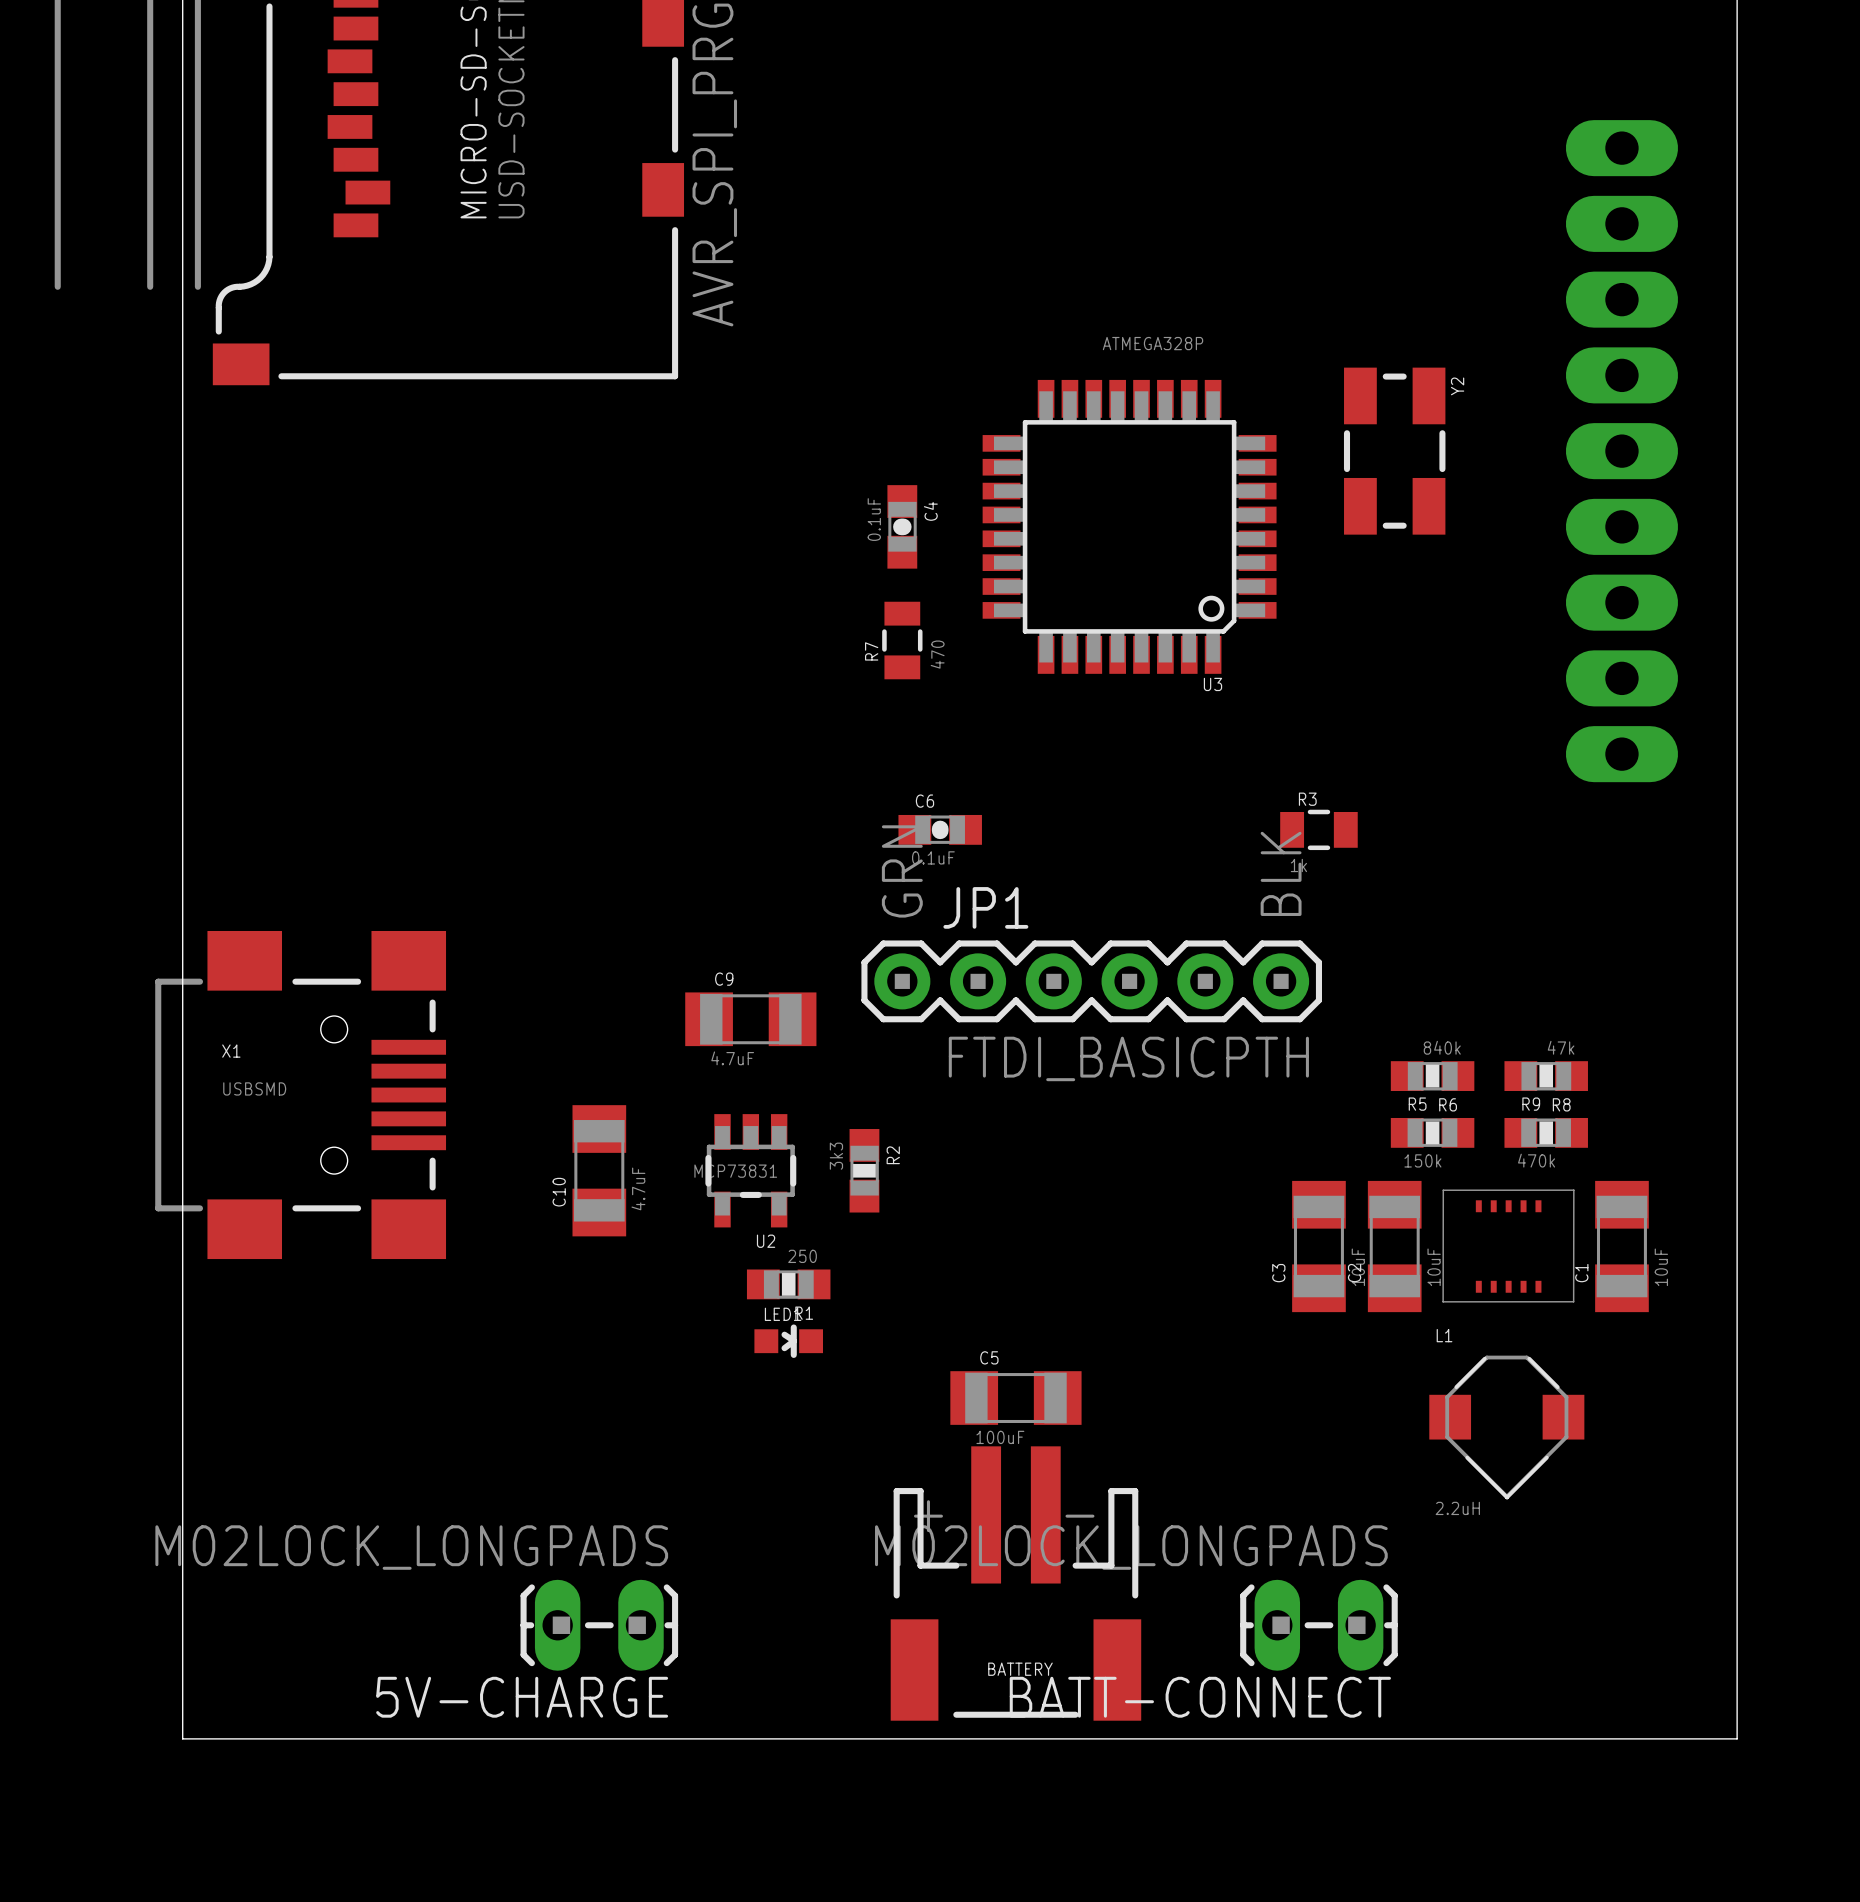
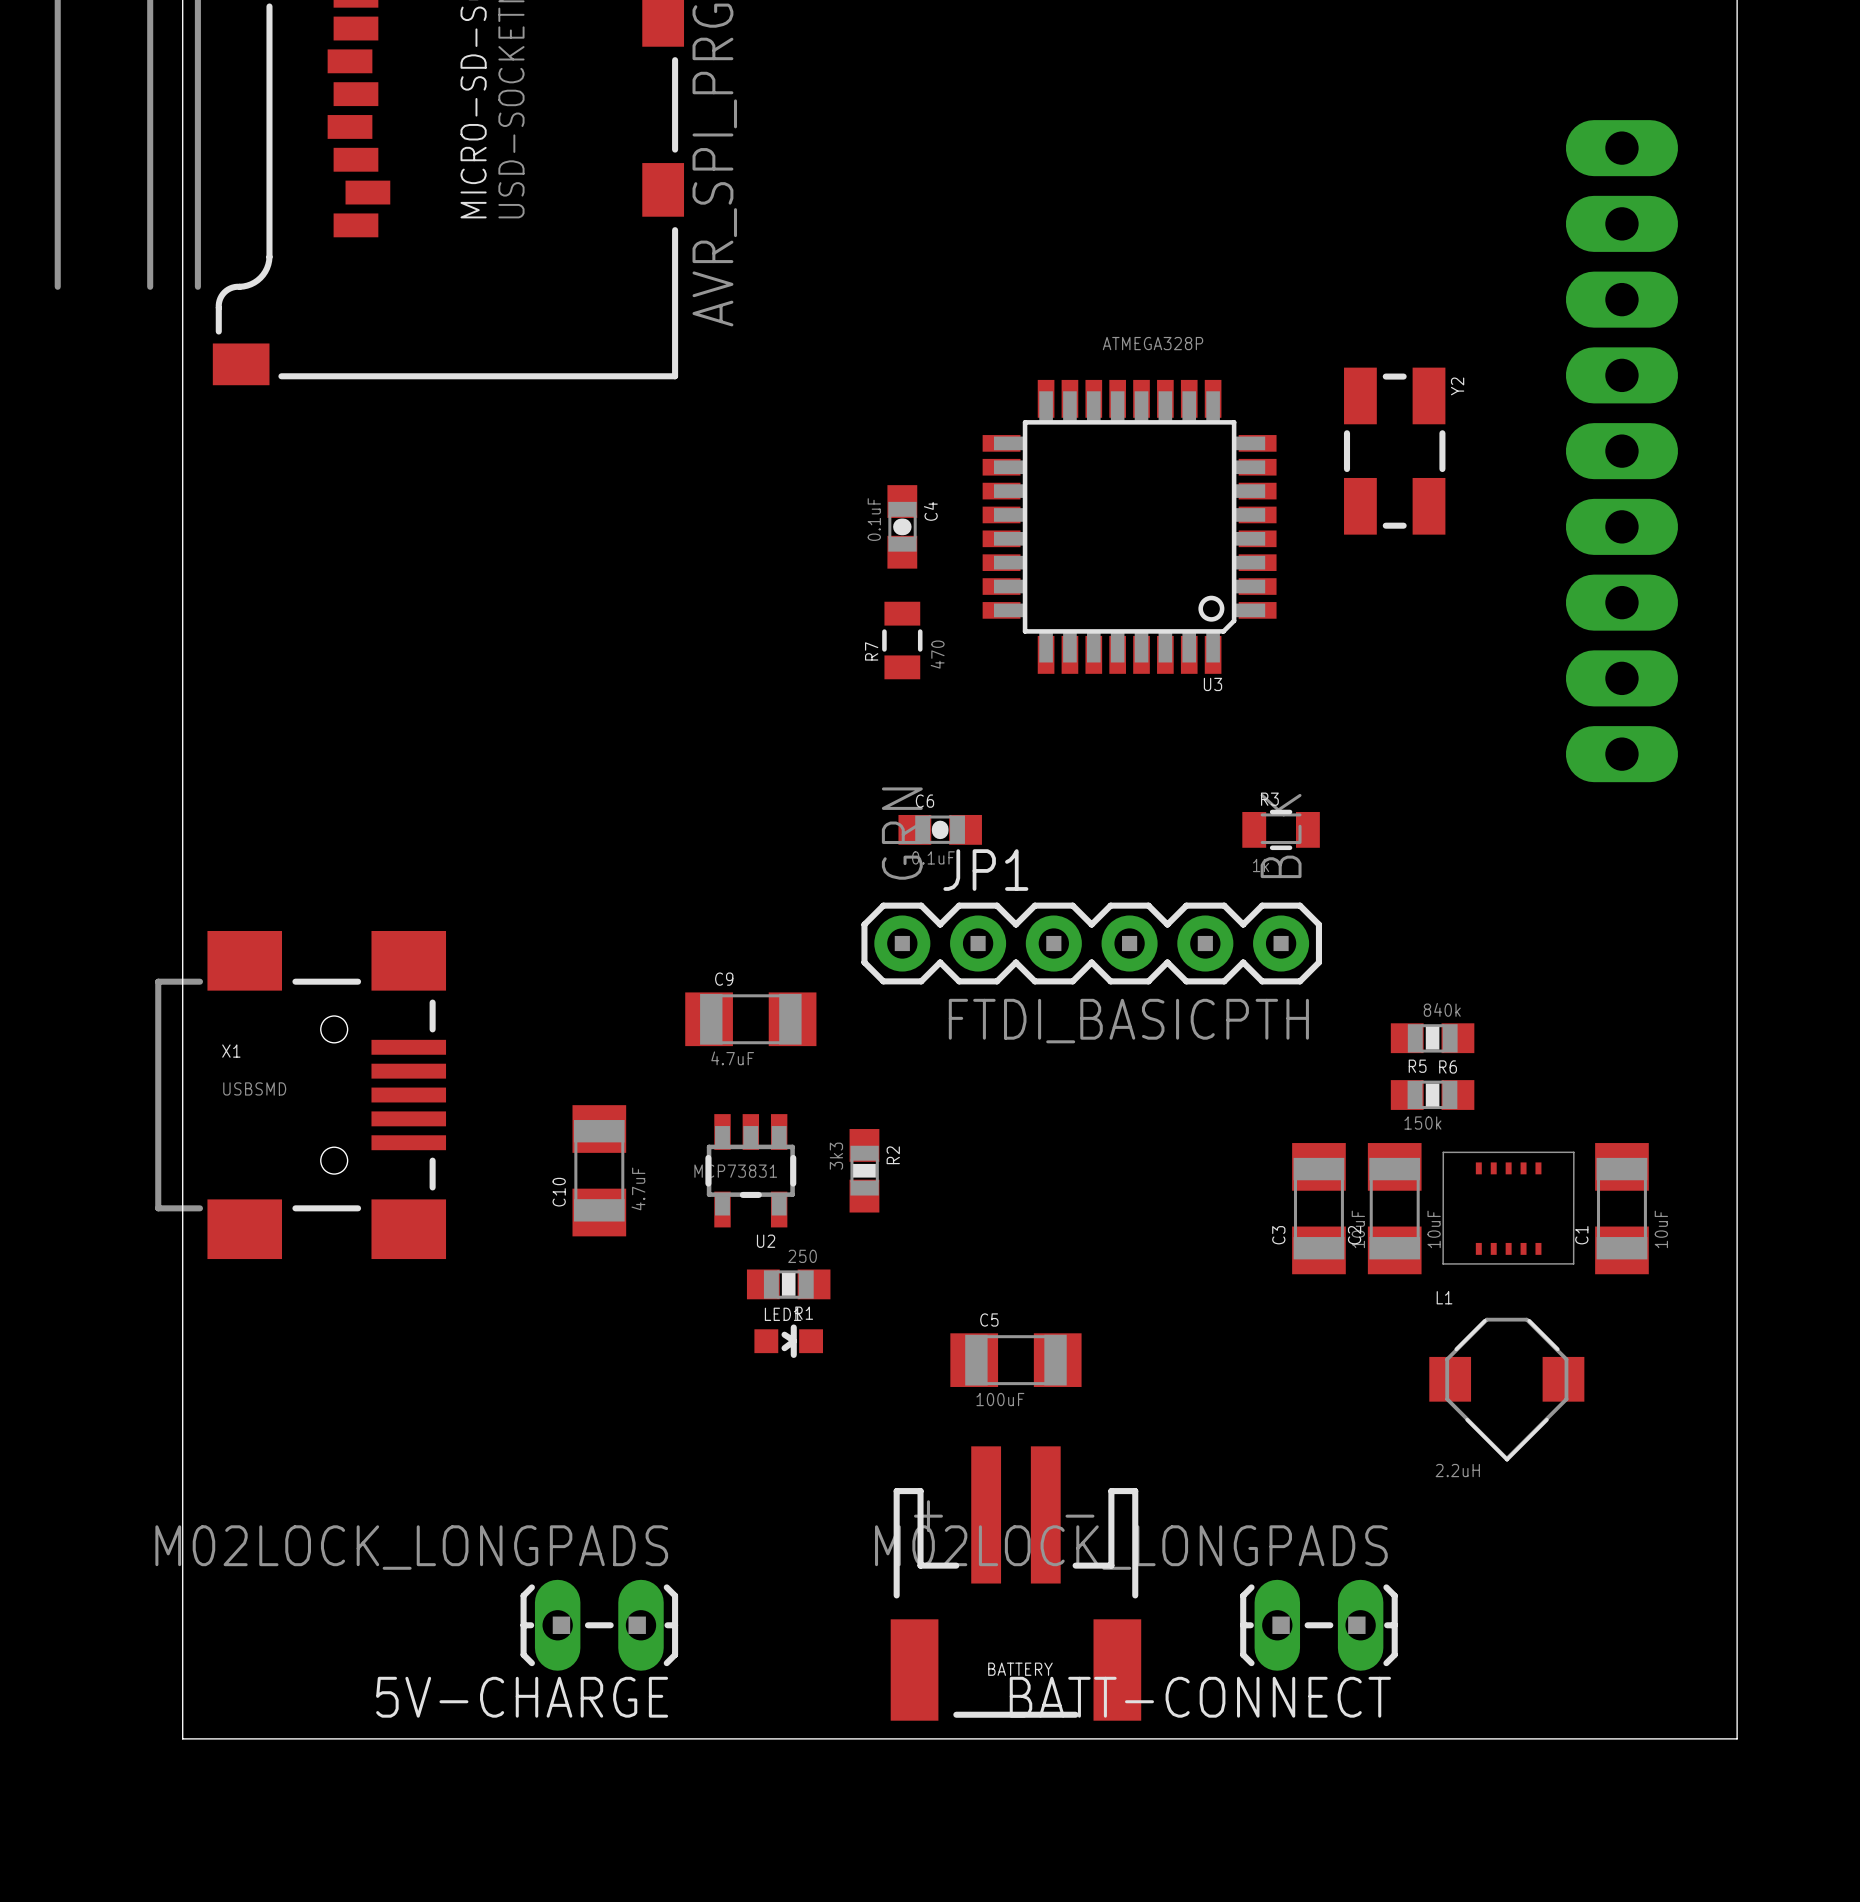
R3 position: (1318, 829) -> (1281, 829)
JP1 position: (1091, 981) -> (1091, 943)
R6 position: (1432, 1076) -> (1432, 1038)
R8: 47k (1546, 1076) -> none
R5 position: (1432, 1132) -> (1432, 1095)
R9: 470k (1546, 1132) -> none
C3 position: (1318, 1246) -> (1318, 1208)
C2 position: (1394, 1246) -> (1394, 1208)
part position: (1508, 1246) -> (1508, 1208)
C1 position: (1621, 1246) -> (1621, 1208)
C5 position: (1015, 1398) -> (1015, 1360)
L1 position: (1506, 1427) -> (1506, 1389)

